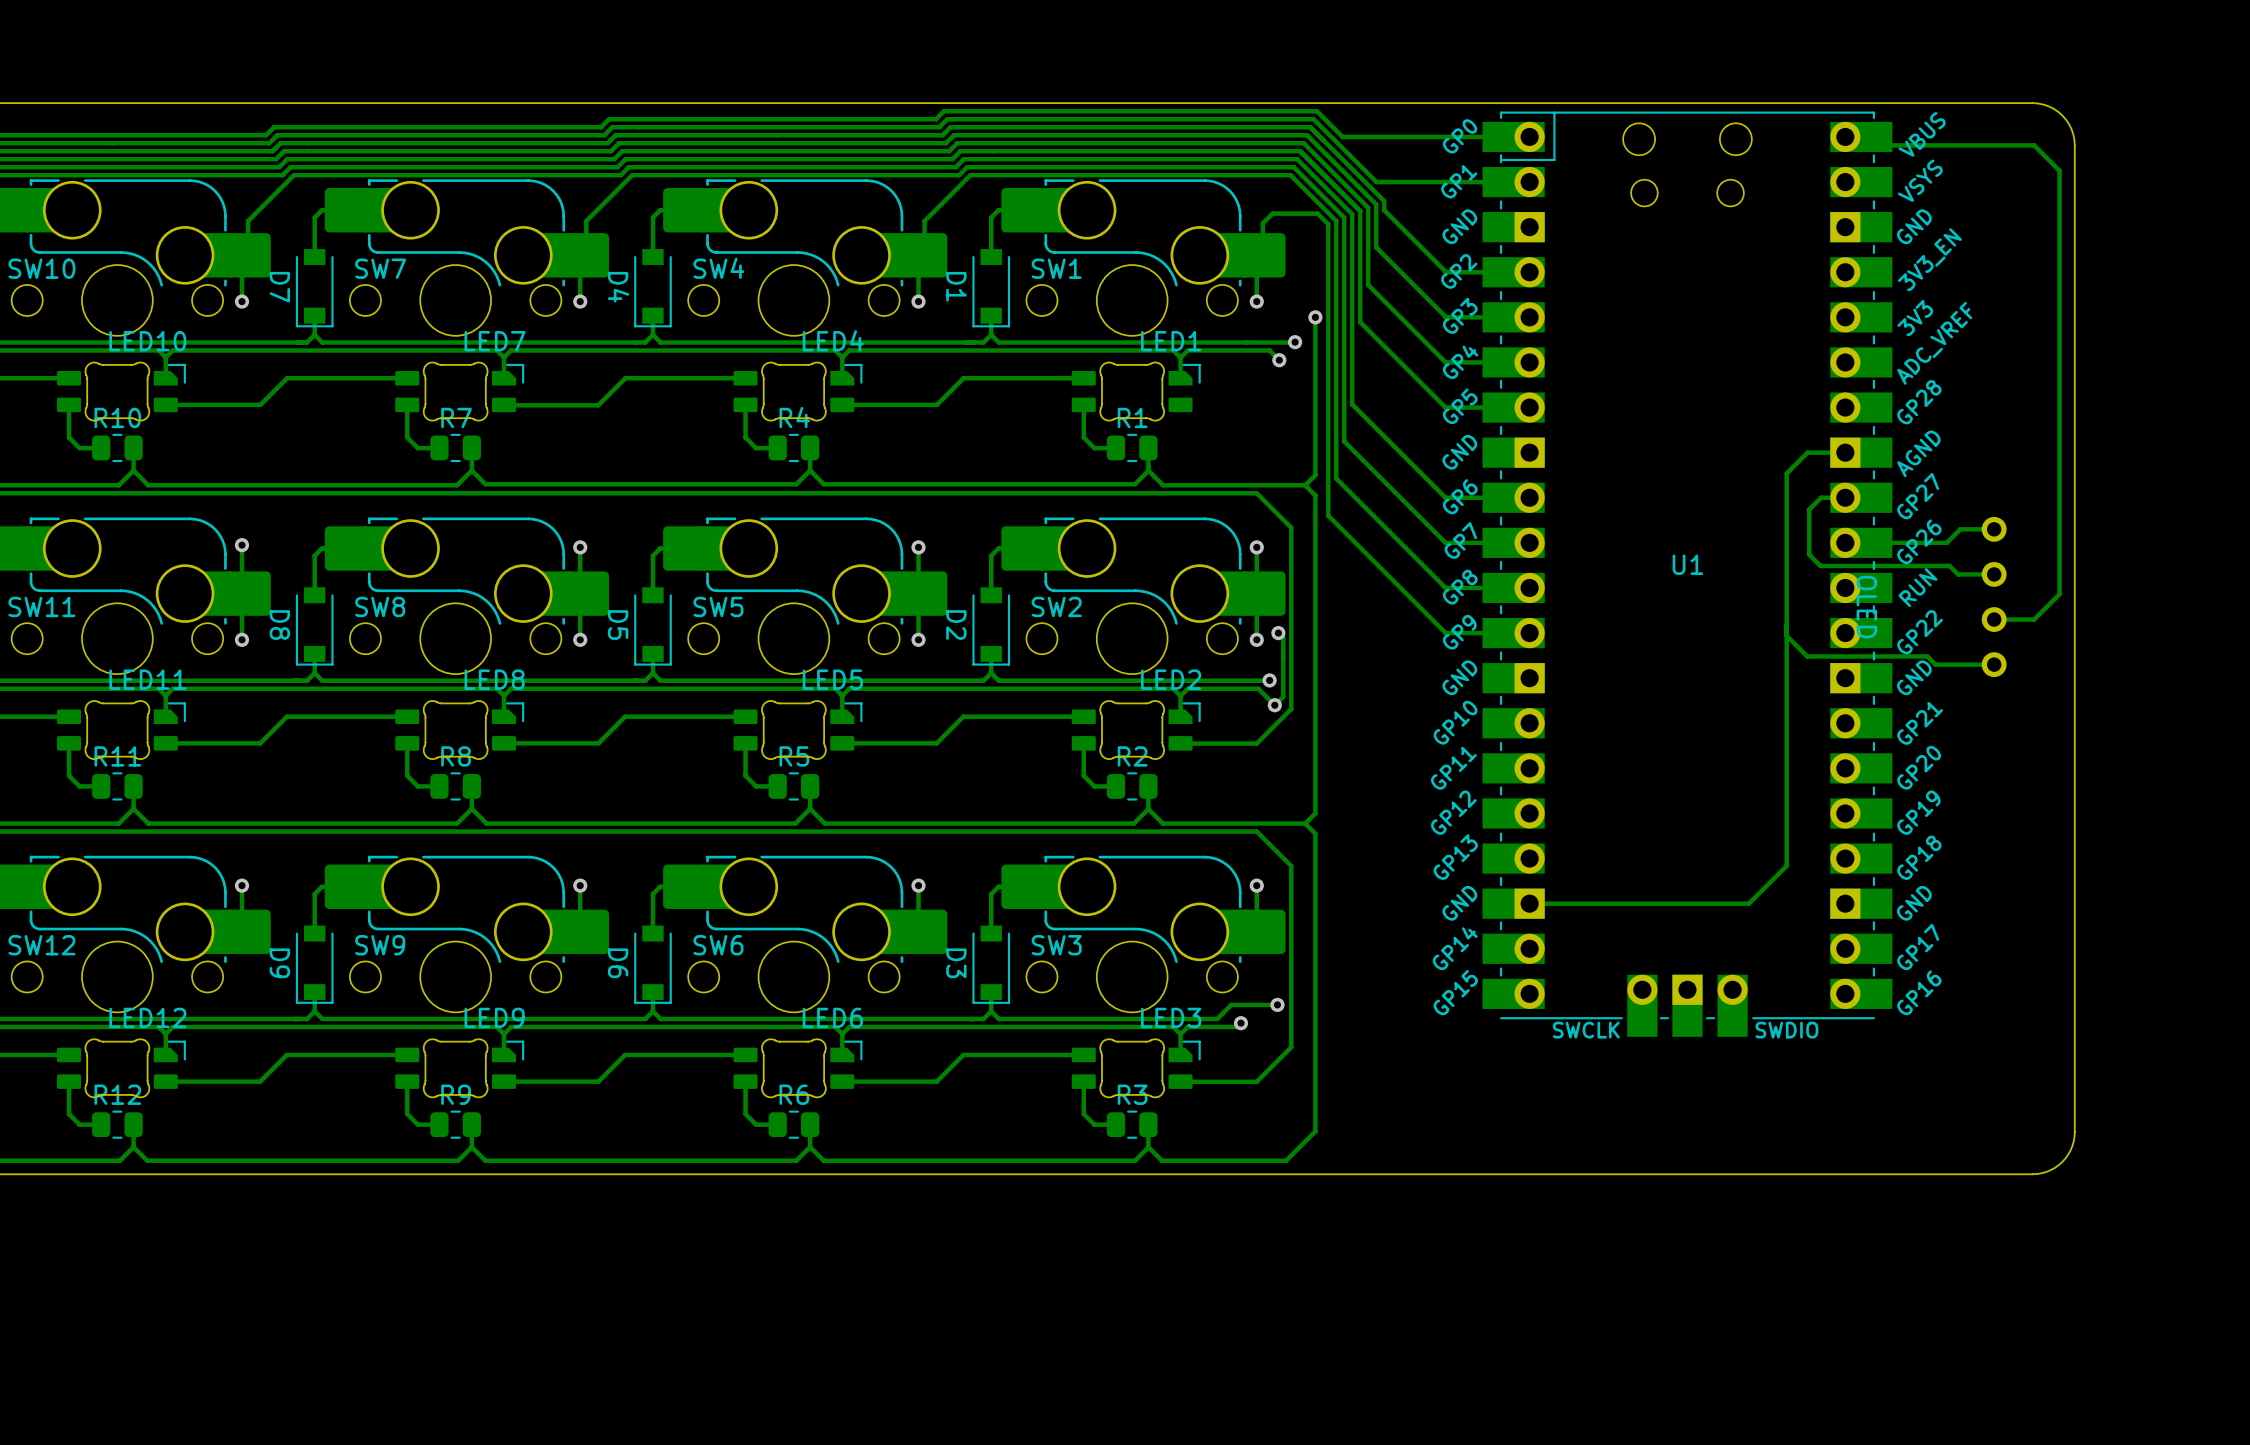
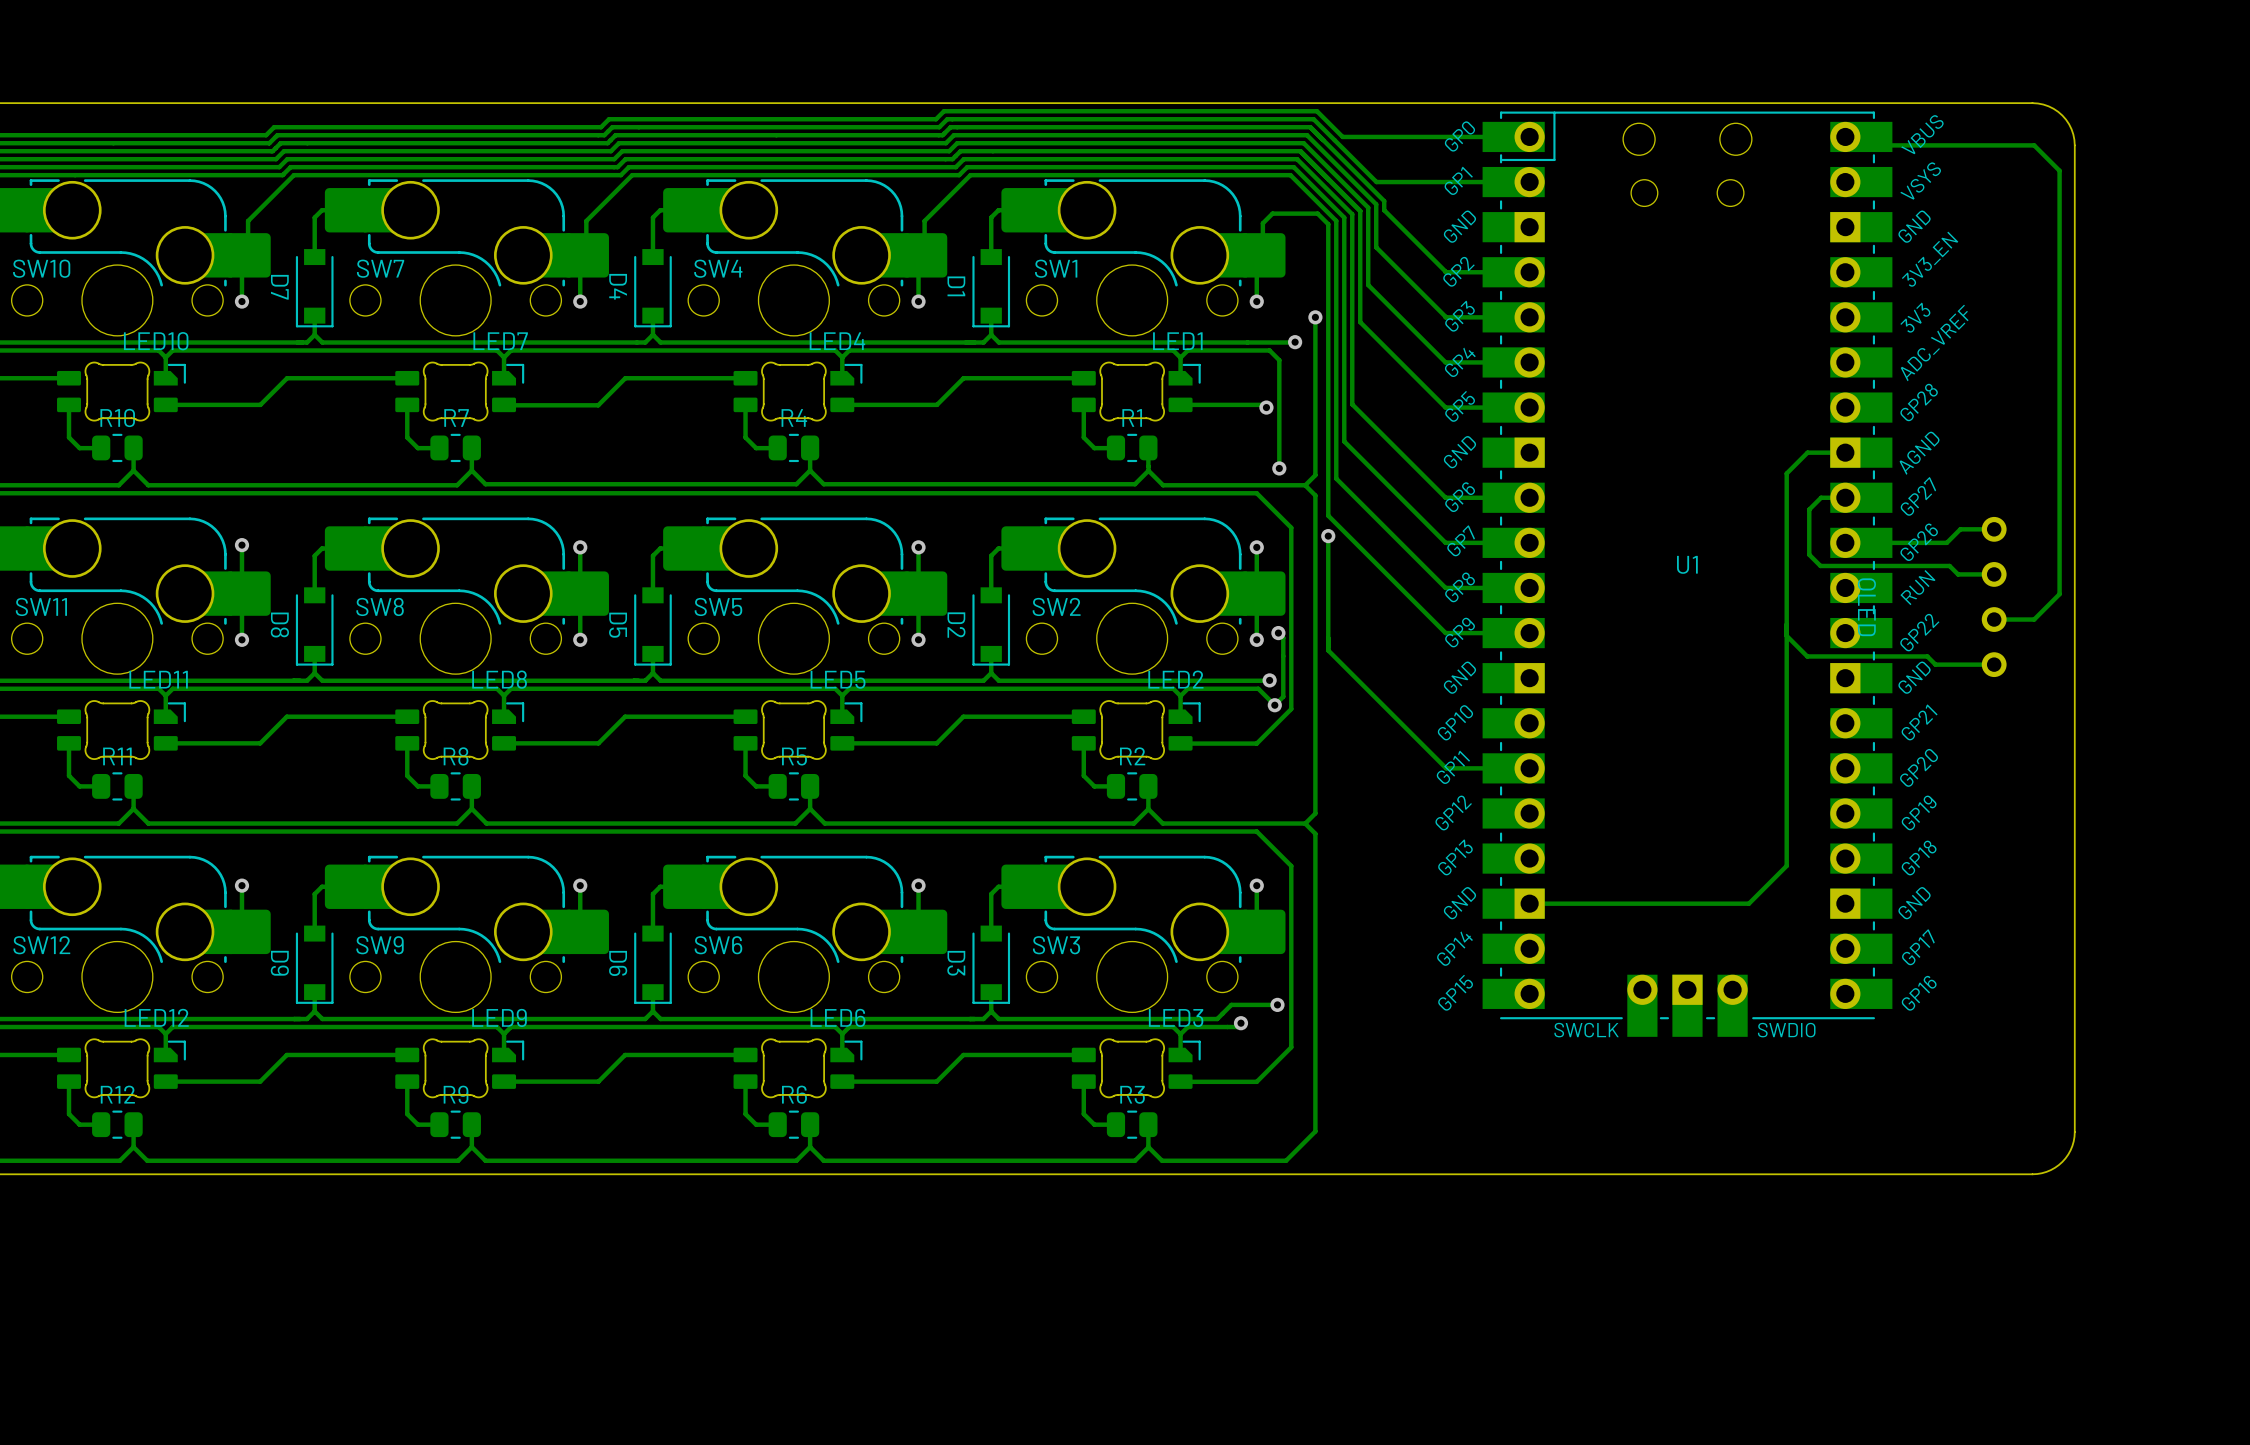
track: none -> (1279, 360) (1279, 468)
via position: (1279, 360) -> (1266, 407)
track: none -> (1180, 404) (1263, 404) (1266, 407)
via: none -> (1279, 468)
track: none -> (1328, 536) (1328, 650) (1446, 768) (1529, 768)
via: none -> (1328, 536)

